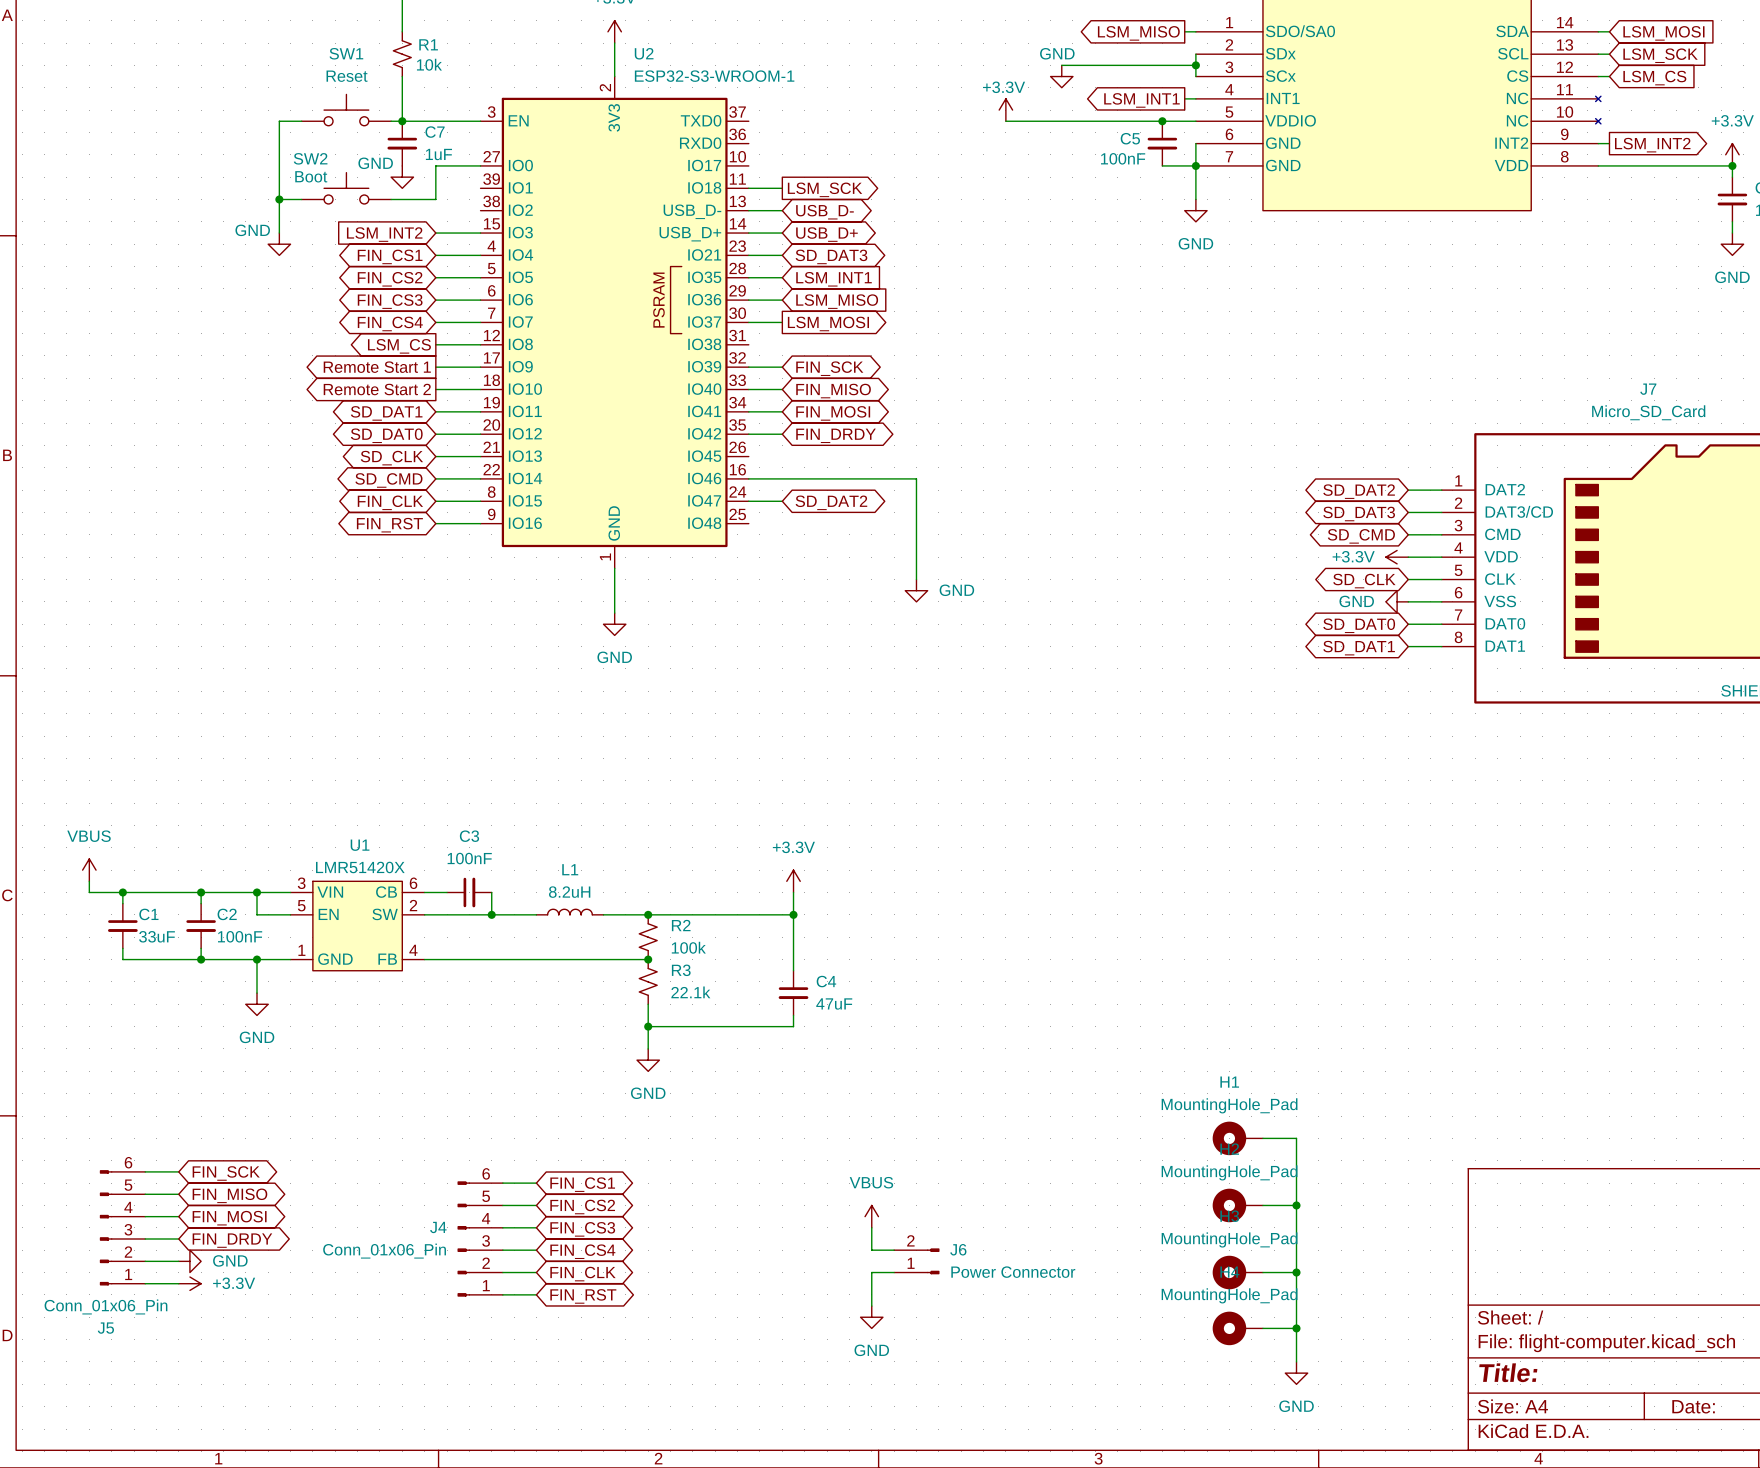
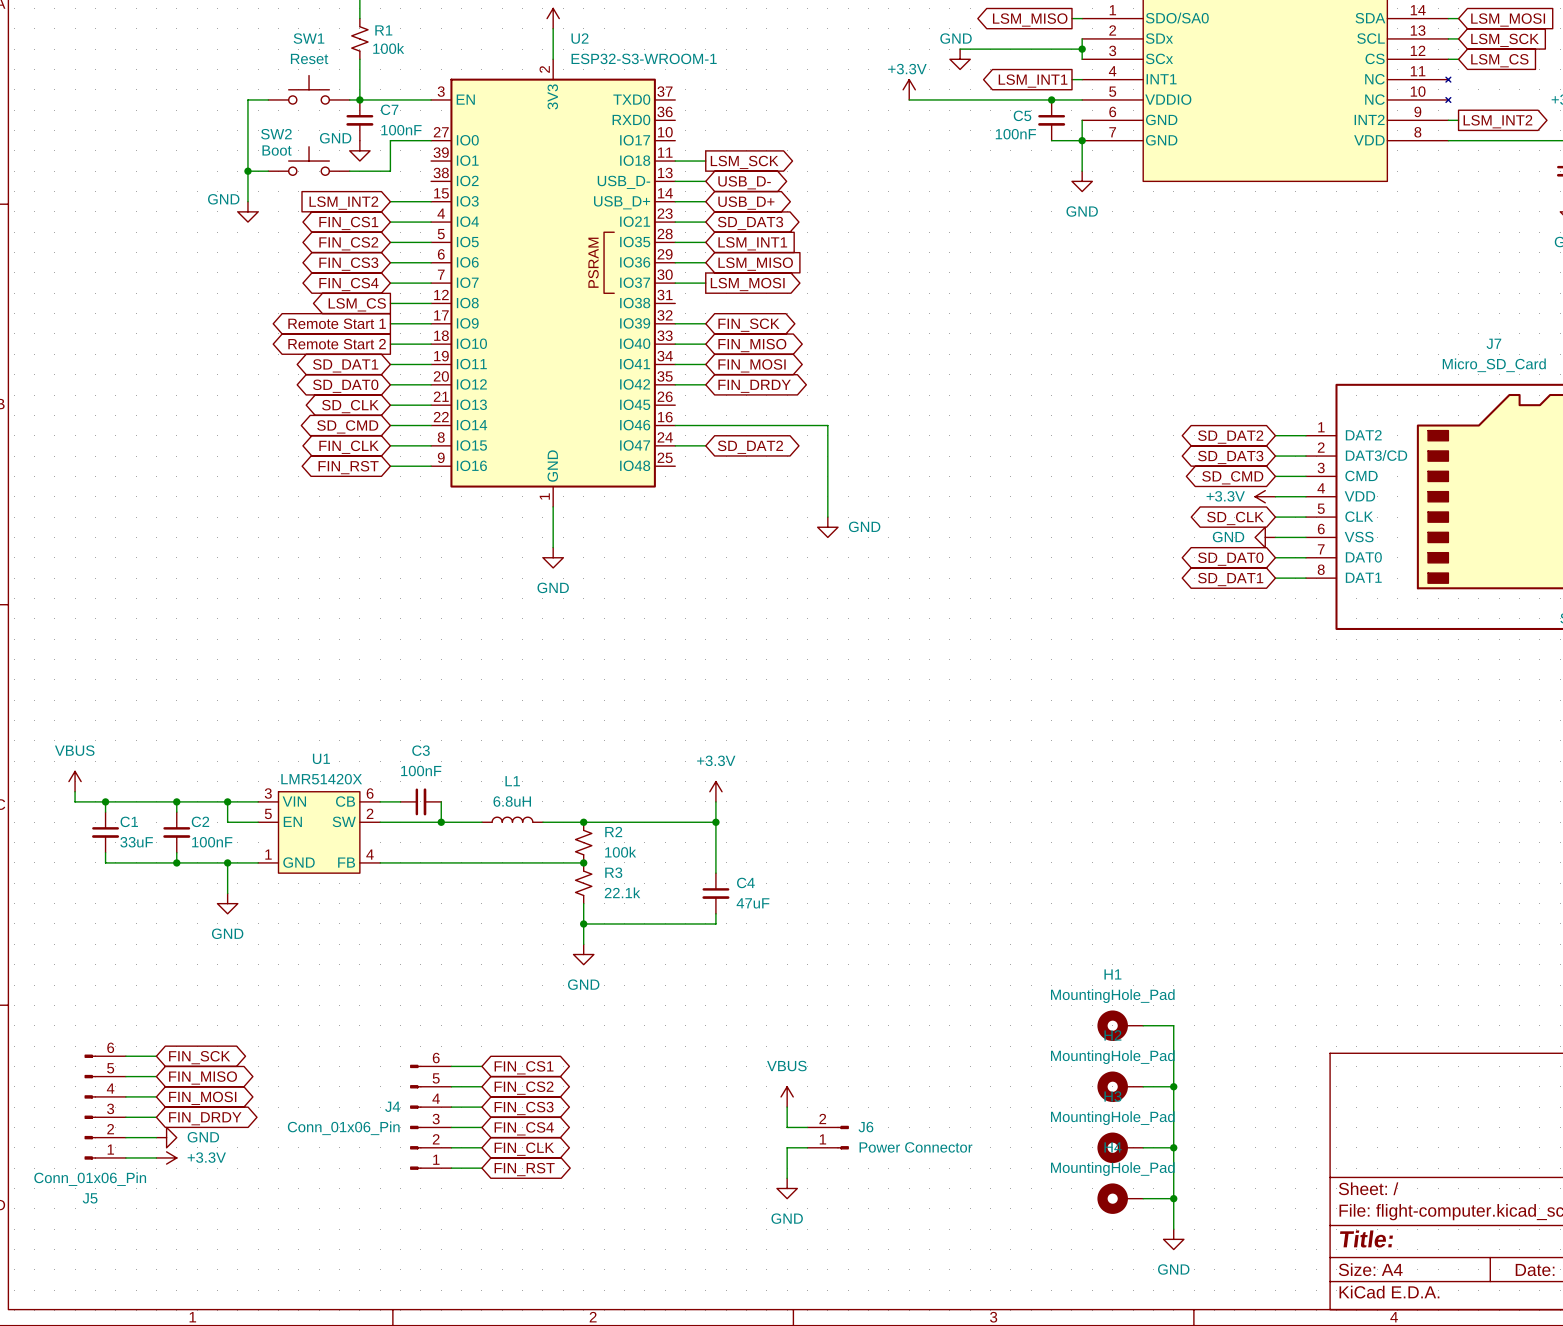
R1 value: 10k (429, 64) -> 100k (388, 48)
C7 value: 1uF (438, 154) -> 100nF (401, 130)
L1 value: 8.2uH (569, 892) -> 6.8uH (512, 801)

